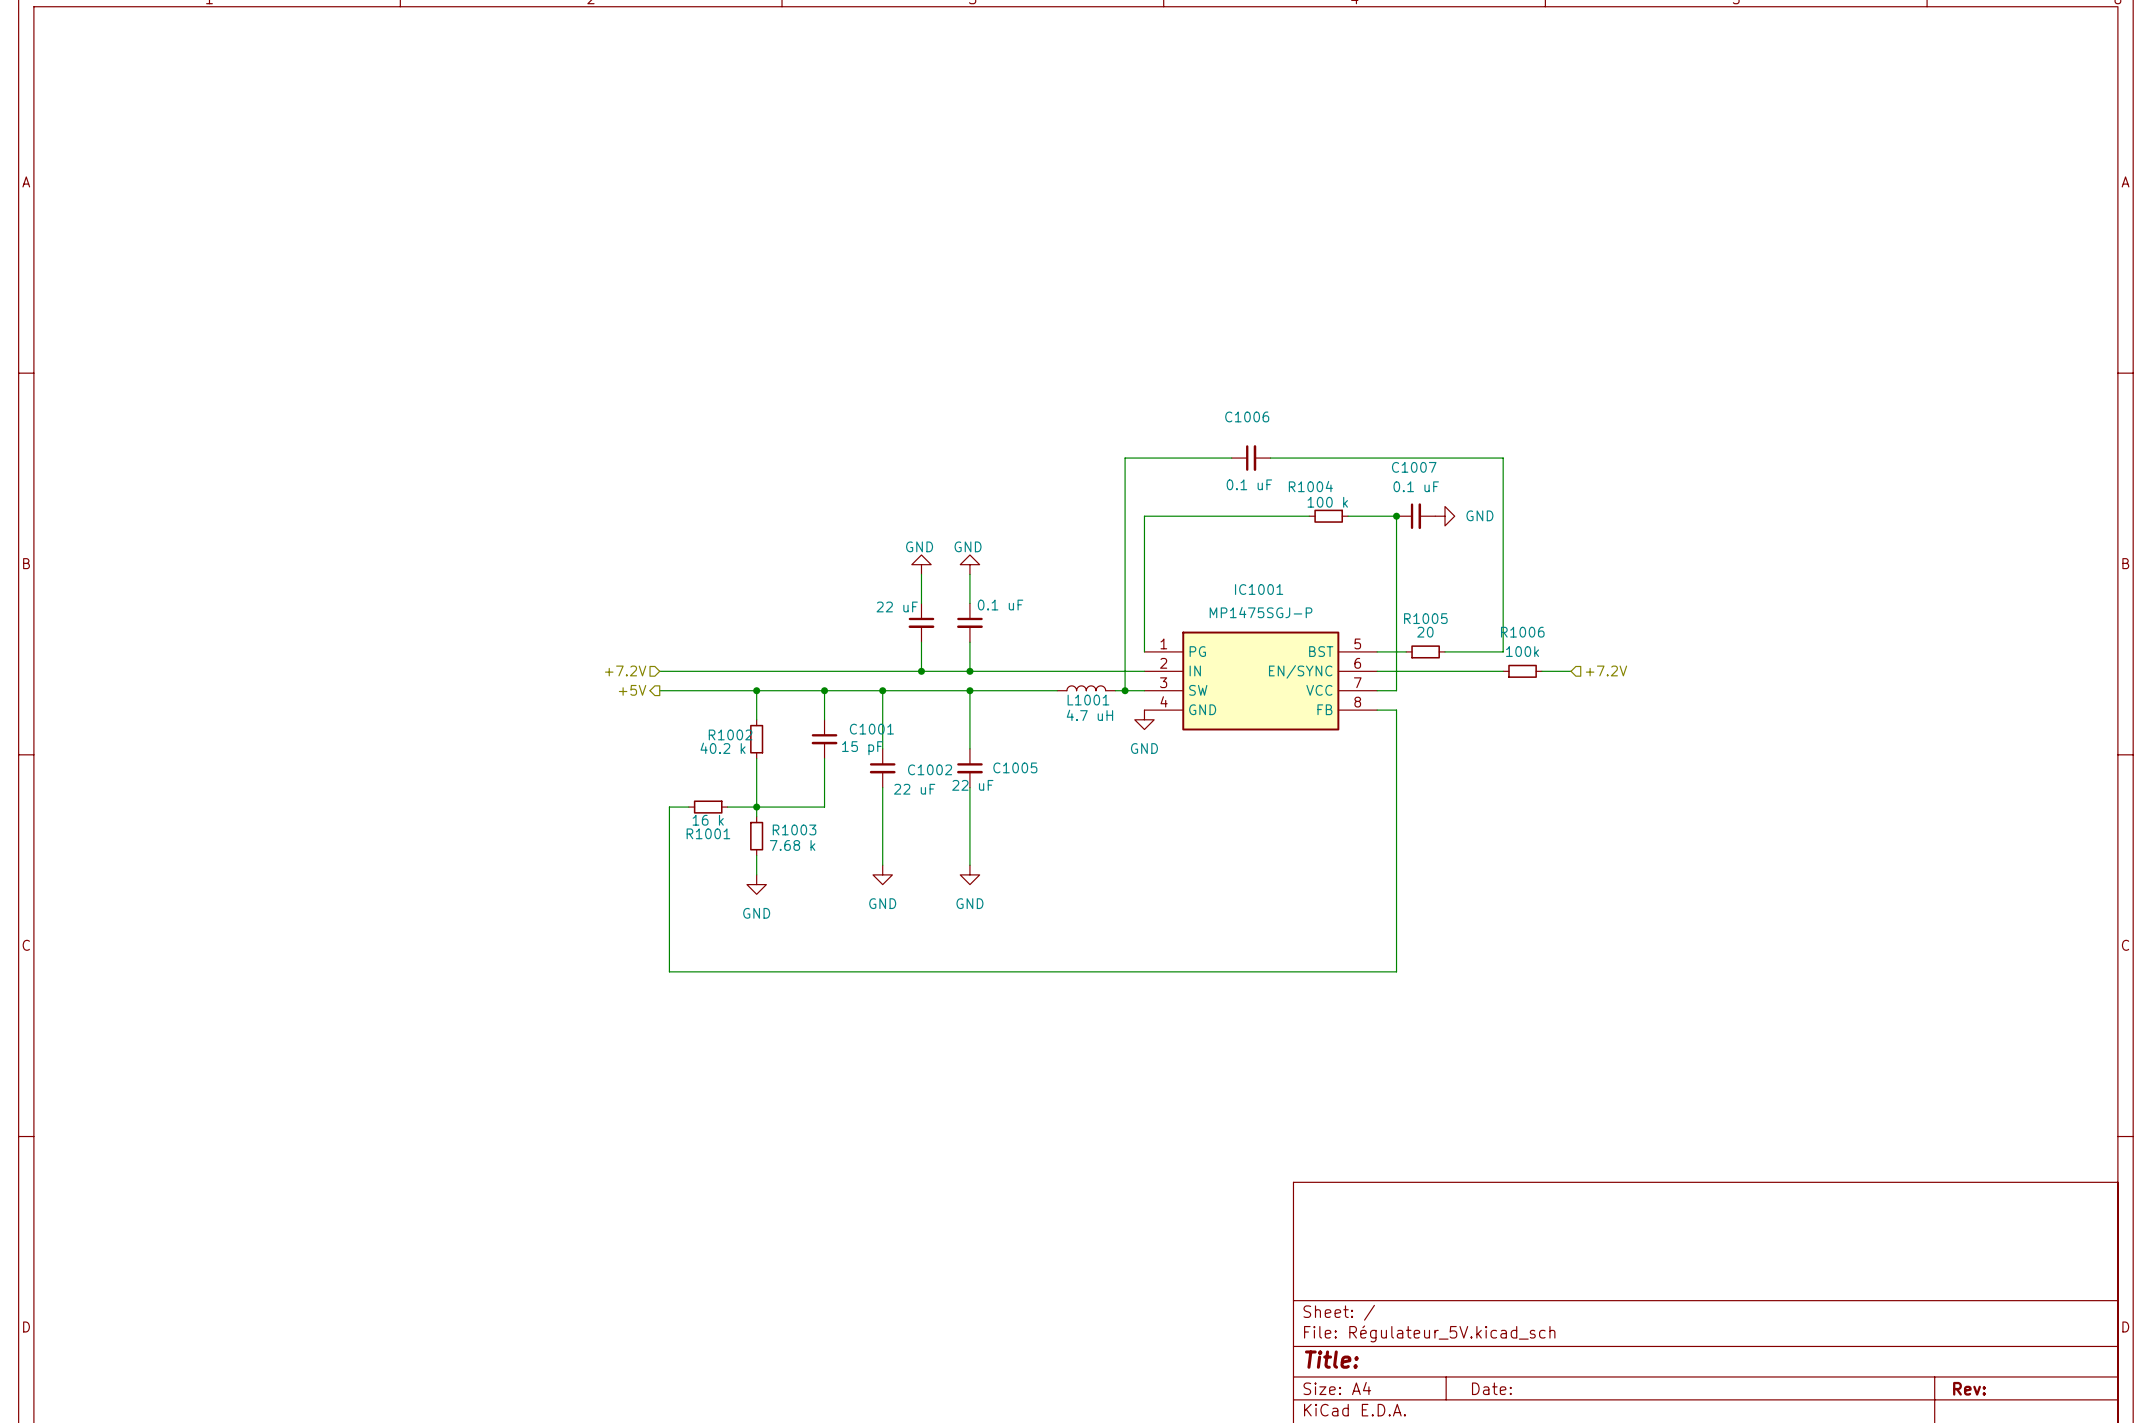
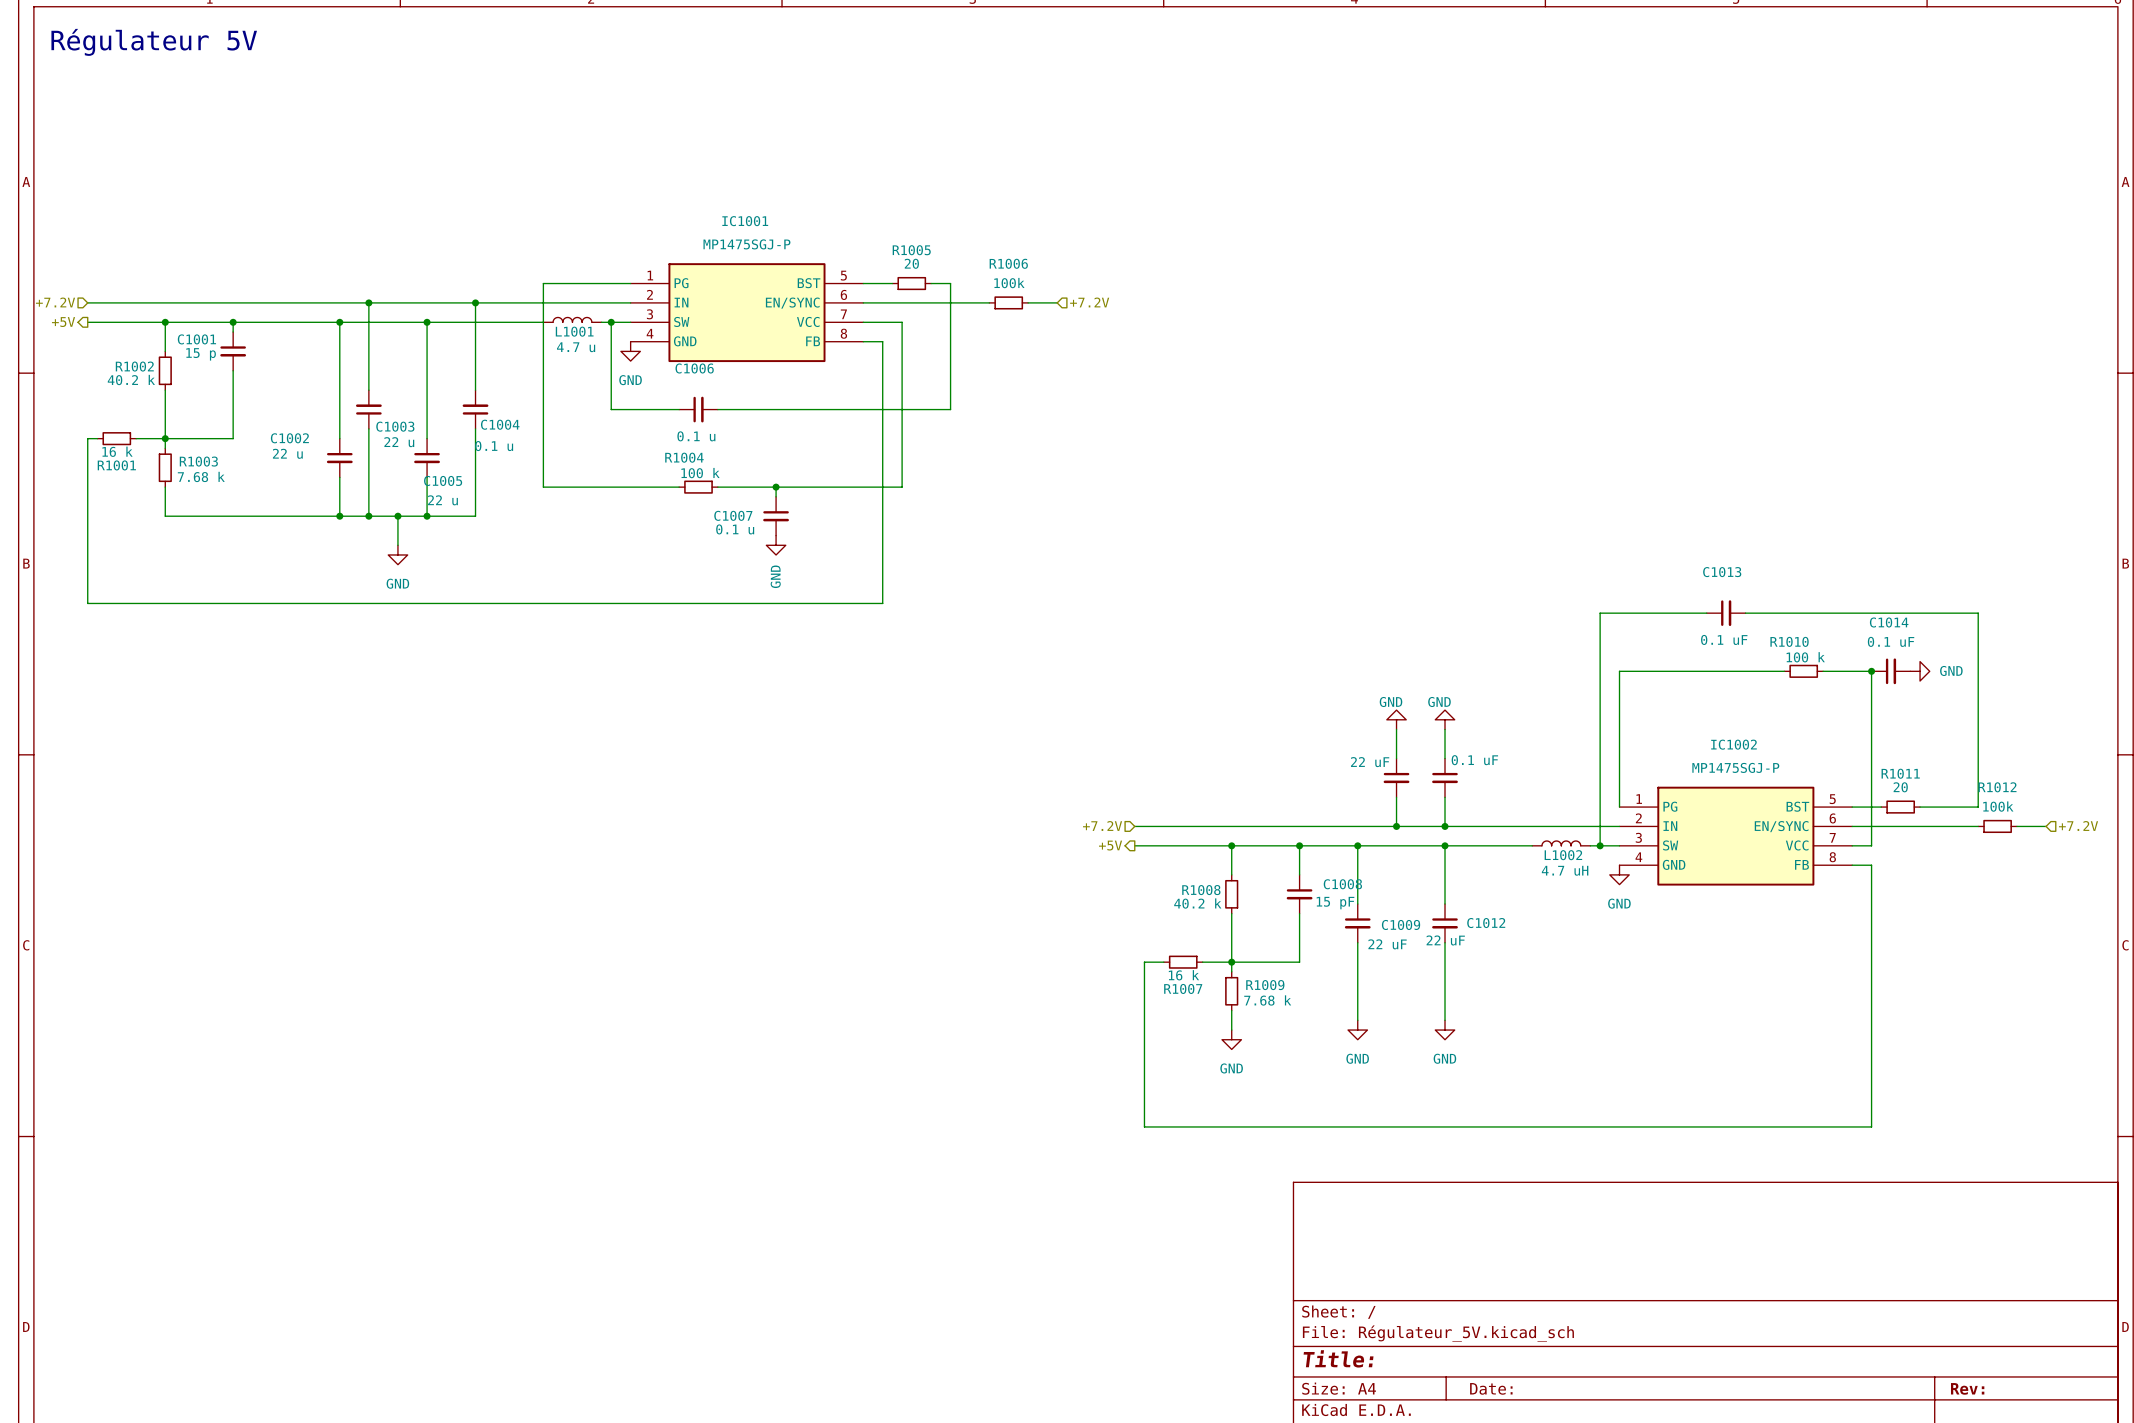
text: none -> Régulateur 5V (154, 42)
wire: none -> (630, 283) (543, 283) (543, 487) (679, 487)
wire: none -> (863, 283) (892, 283)
wire: none -> (931, 283) (950, 283) (950, 409) (717, 409)
hierarchical label: none -> +7.2V (55, 302)
wire: none -> (87, 302) (630, 302)
wire: none -> (368, 302) (368, 390)
junction: none -> (368, 302)
wire: none -> (475, 302) (475, 390)
junction: none -> (475, 302)
wire: none -> (863, 302) (989, 302)
wire: none -> (1028, 302) (1057, 302)
hierarchical label: none -> +7.2V (1089, 302)
hierarchical label: none -> +5V (63, 322)
wire: none -> (87, 322) (543, 322)
wire: none -> (165, 322) (165, 351)
junction: none -> (165, 322)
wire: none -> (233, 322) (233, 332)
junction: none -> (233, 322)
wire: none -> (339, 322) (339, 438)
junction: none -> (339, 322)
wire: none -> (427, 322) (427, 438)
junction: none -> (427, 322)
wire: none -> (601, 322) (630, 322)
wire: none -> (611, 322) (611, 409) (679, 409)
junction: none -> (611, 322)
wire: none -> (863, 322) (902, 322) (902, 487) (717, 487)
wire: none -> (863, 341) (882, 341) (882, 603) (87, 603) (87, 438) (97, 438)
power symbol: none -> GND (630, 351)
wire: none -> (233, 370) (233, 438) (136, 438)
wire: none -> (165, 390) (165, 448)
C1003: none -> 22 u (368, 409)
C1004: none -> 0.1 u (475, 409)
wire: none -> (368, 428) (368, 516)
wire: none -> (475, 428) (475, 516) (165, 516) (165, 487)
junction: none -> (165, 438)
wire: (1231, 458) (1125, 458) (1125, 690) -> none
C1006 position: (1251, 458) -> (698, 409)
wire: (1270, 458) (1503, 458) (1503, 651) (1445, 651) -> none
C1007 name position: C1007 (1414, 467) -> C1007 (733, 515)
wire: none -> (339, 477) (339, 516)
wire: none -> (427, 477) (427, 516)
C1006 value: 0.1 uF (1249, 484) -> 0.1 u (696, 436)
C1007 value: 0.1 uF (1416, 486) -> 0.1 u (735, 529)
wire: none -> (776, 487) (776, 496)
junction: none -> (776, 487)
junction: none -> (339, 516)
junction: none -> (368, 516)
wire: none -> (397, 516) (397, 545)
junction: none -> (397, 516)
junction: none -> (427, 516)
wire: (1309, 516) (1144, 516) (1144, 651) -> none
R1004 position: (1328, 516) -> (698, 487)
wire: (1348, 516) (1396, 516) (1396, 690) (1377, 690) -> none
junction: (1396, 516) -> none
C1007 rotation: 0° (1415, 516) -> 90° clockwise (776, 516)
C1007 position: (1415, 516) -> (776, 516)
power symbol: GND (1445, 516) -> none
power symbol: none -> GND (776, 545)
power symbol: none -> GND (397, 554)
power symbol: GND (921, 564) -> none
power symbol: GND (969, 564) -> none
wire: (921, 574) (921, 603) -> none
wire: (969, 574) (969, 603) -> none
wire: none -> (1706, 613) (1600, 613) (1600, 845)
C1013: none -> 0.1 uF (1726, 613)
wire: none -> (1745, 613) (1978, 613) (1978, 807) (1920, 807)
part: 22 uF (921, 622) -> none
part: 0.1 uF (969, 622) -> none
wire: (921, 642) (921, 671) -> none
wire: (969, 642) (969, 671) -> none
wire: (1377, 651) (1406, 651) -> none
R1005 position: (1425, 651) -> (911, 283)
hierarchical label: +7.2V (625, 670) -> none
hierarchical label: +7.2V (1606, 670) -> none
wire: (659, 671) (1144, 671) -> none
junction: (921, 671) -> none
junction: (969, 671) -> none
wire: (1377, 671) (1503, 671) -> none
R1006 position: (1522, 671) -> (1008, 302)
wire: (1541, 671) (1571, 671) -> (1590, 845) (1619, 845)
wire: none -> (1784, 671) (1619, 671) (1619, 807)
R1010: none -> 100 k (1803, 671)
wire: none -> (1823, 671) (1871, 671) (1871, 845) (1852, 845)
junction: none -> (1871, 671)
C1014: none -> 0.1 uF (1890, 671)
power symbol: none -> GND (1920, 671)
IC1001 position: (1260, 681) -> (746, 312)
L1001 position: (1086, 688) -> (572, 319)
hierarchical label: +5V (632, 690) -> none
wire: (659, 690) (1057, 690) -> none
wire: (756, 690) (756, 719) -> none
junction: (756, 690) -> none
wire: (824, 690) (824, 719) -> none
junction: (824, 690) -> none
wire: (882, 690) (882, 748) -> none
junction: (882, 690) -> none
wire: (969, 690) (969, 748) -> none
junction: (969, 690) -> none
wire: (1115, 690) (1144, 690) -> none
junction: (1125, 690) -> none
wire: (1377, 710) (1396, 710) (1396, 729) -> none
L1001 value: 4.7 uH (1089, 715) -> 4.7 u (576, 347)
power symbol: GND (1144, 719) -> none
power symbol: none -> GND (1396, 719)
power symbol: none -> GND (1445, 719)
C1001 name position: C1001 (871, 729) -> C1001 (196, 339)
wire: none -> (1445, 729) (1445, 758)
R1002 position: (756, 739) -> (165, 370)
C1001 position: (824, 739) -> (233, 351)
C1001 value: 15 pF (862, 748) -> 15 p (201, 354)
wire: (756, 758) (756, 816) -> none
wire: (824, 758) (824, 807) (727, 807) -> none
C1005 name position: C1005 (1015, 767) -> C1005 (443, 480)
C1002 position: (882, 768) -> (339, 458)
C1005 position: (969, 768) -> (427, 458)
C1002 name position: C1002 (930, 769) -> C1002 (289, 438)
part: none -> 22 uF (1396, 777)
part: none -> 0.1 uF (1445, 777)
C1005 value: 22 uF (972, 785) -> 22 u (442, 500)
wire: (882, 787) (882, 865) -> none
wire: (969, 787) (969, 865) -> none
C1002 value: 22 uF (914, 789) -> 22 u (287, 453)
wire: none -> (1445, 797) (1445, 826)
wire: (688, 807) (669, 807) (669, 971) (1396, 971) (1396, 826) -> none
R1001 position: (708, 807) -> (116, 438)
junction: (756, 807) -> none
wire: none -> (1852, 807) (1881, 807)
R1011: none -> 20 (1900, 807)
hierarchical label: none -> +7.2V (1102, 825)
wire: none -> (1134, 826) (1619, 826)
junction: none -> (1396, 826)
junction: none -> (1445, 826)
wire: none -> (1852, 826) (1978, 826)
R1012: none -> 100k (1997, 826)
wire: none -> (2016, 826) (2046, 826)
hierarchical label: none -> +7.2V (2078, 825)
R1003 position: (756, 836) -> (165, 467)
IC1002: none -> MP1475SGJ-P (1735, 836)
L1002: none -> 4.7 uH (1561, 843)
hierarchical label: none -> +5V (1110, 845)
wire: none -> (1134, 845) (1532, 845)
wire: none -> (1231, 845) (1231, 874)
junction: none -> (1231, 845)
wire: none -> (1299, 845) (1299, 874)
junction: none -> (1299, 845)
wire: none -> (1357, 845) (1357, 904)
junction: none -> (1357, 845)
wire: none -> (1445, 845) (1445, 904)
junction: none -> (1445, 845)
junction: none -> (1600, 845)
wire: (756, 855) (756, 874) -> none
wire: none -> (1852, 865) (1871, 865) (1871, 1126) (1144, 1126) (1144, 962) (1163, 962)
power symbol: GND (882, 874) -> none
power symbol: GND (969, 874) -> none
power symbol: none -> GND (1619, 874)
power symbol: GND (756, 884) -> none
R1008: none -> 40.2 k (1231, 894)
C1008: none -> 15 pF (1299, 894)
wire: none -> (1231, 913) (1231, 971)
wire: none -> (1299, 913) (1299, 962) (1202, 962)
C1009: none -> 22 uF (1357, 923)
C1012: none -> 22 uF (1445, 923)
wire: none -> (1357, 942) (1357, 1020)
wire: none -> (1445, 942) (1445, 1020)
R1007: none -> 16 k (1183, 962)
junction: none -> (1231, 962)
R1009: none -> 7.68 k (1231, 991)
wire: none -> (1231, 1010) (1231, 1030)
power symbol: none -> GND (1357, 1030)
power symbol: none -> GND (1445, 1030)
power symbol: none -> GND (1231, 1039)

